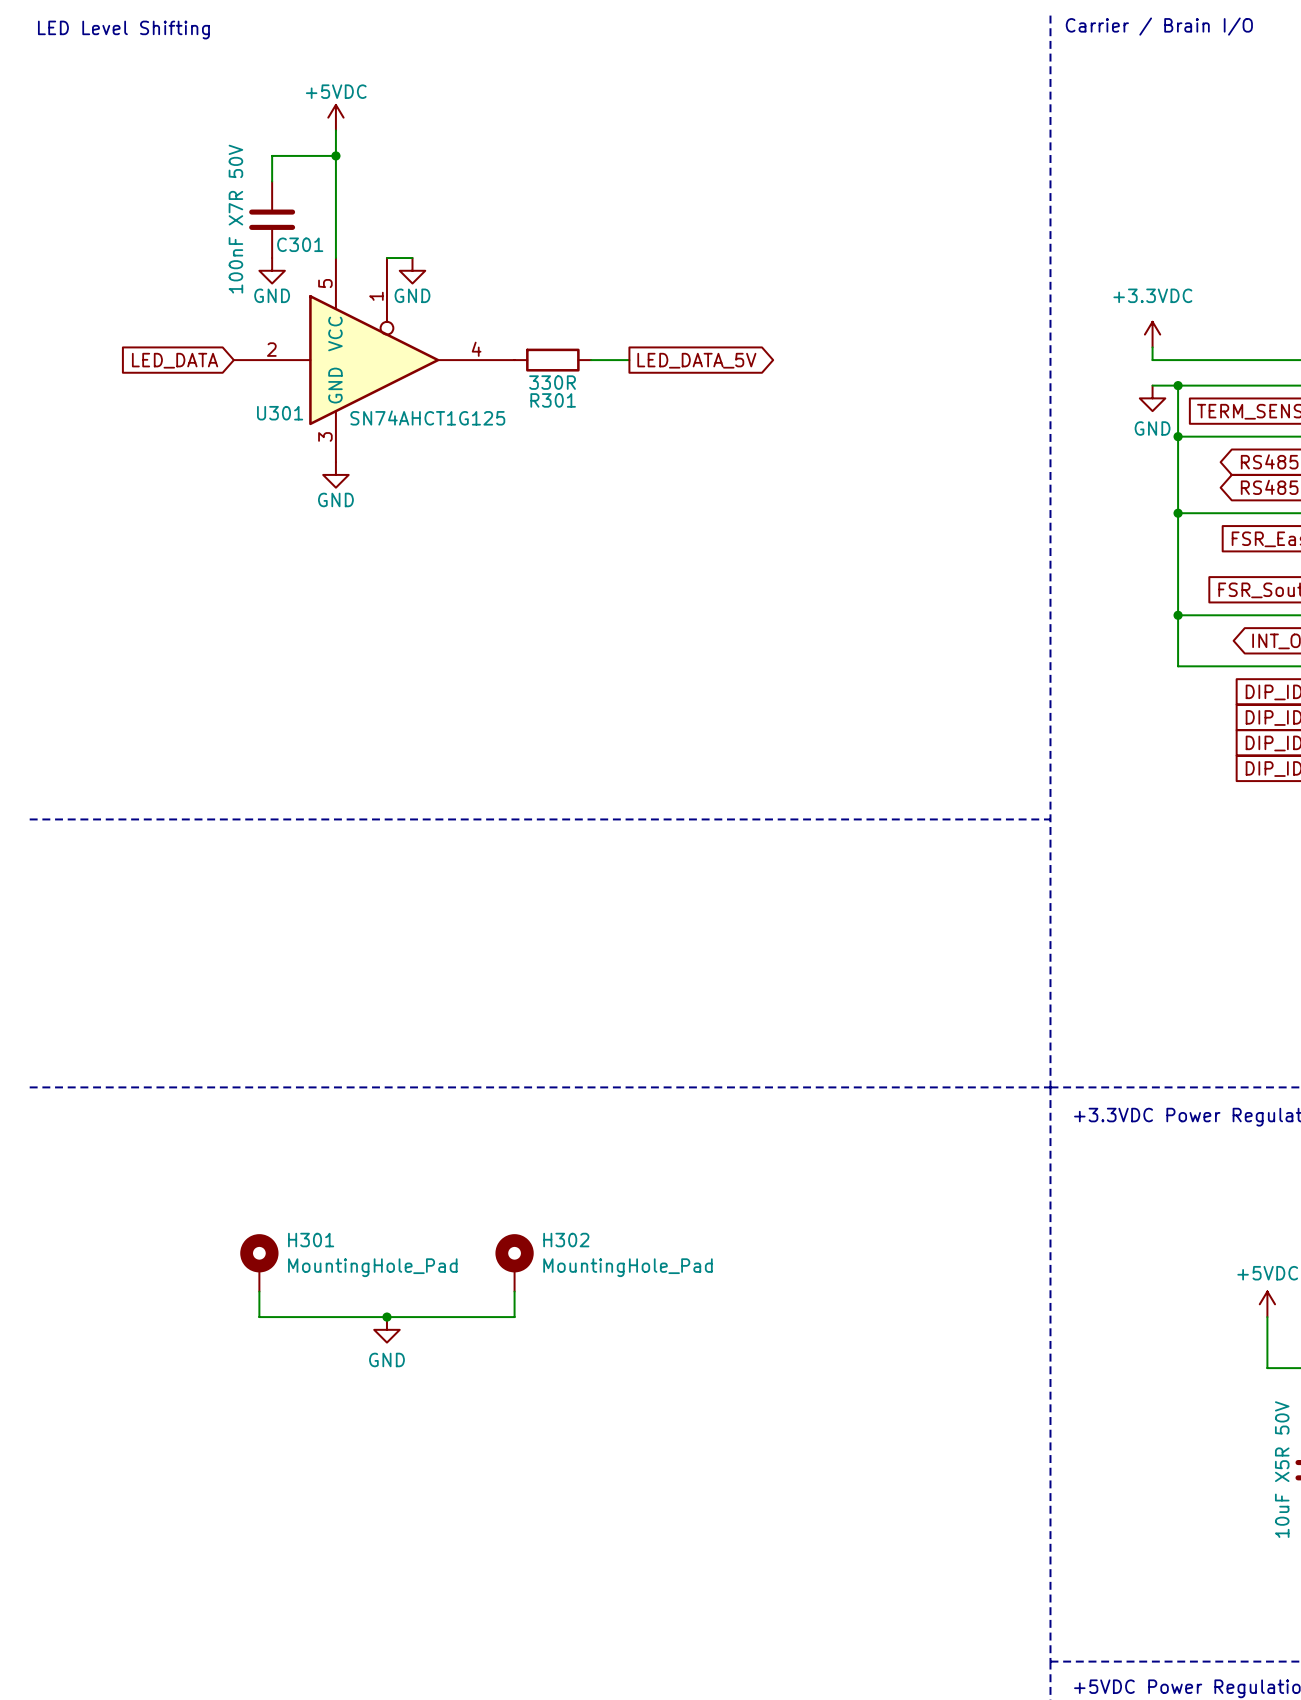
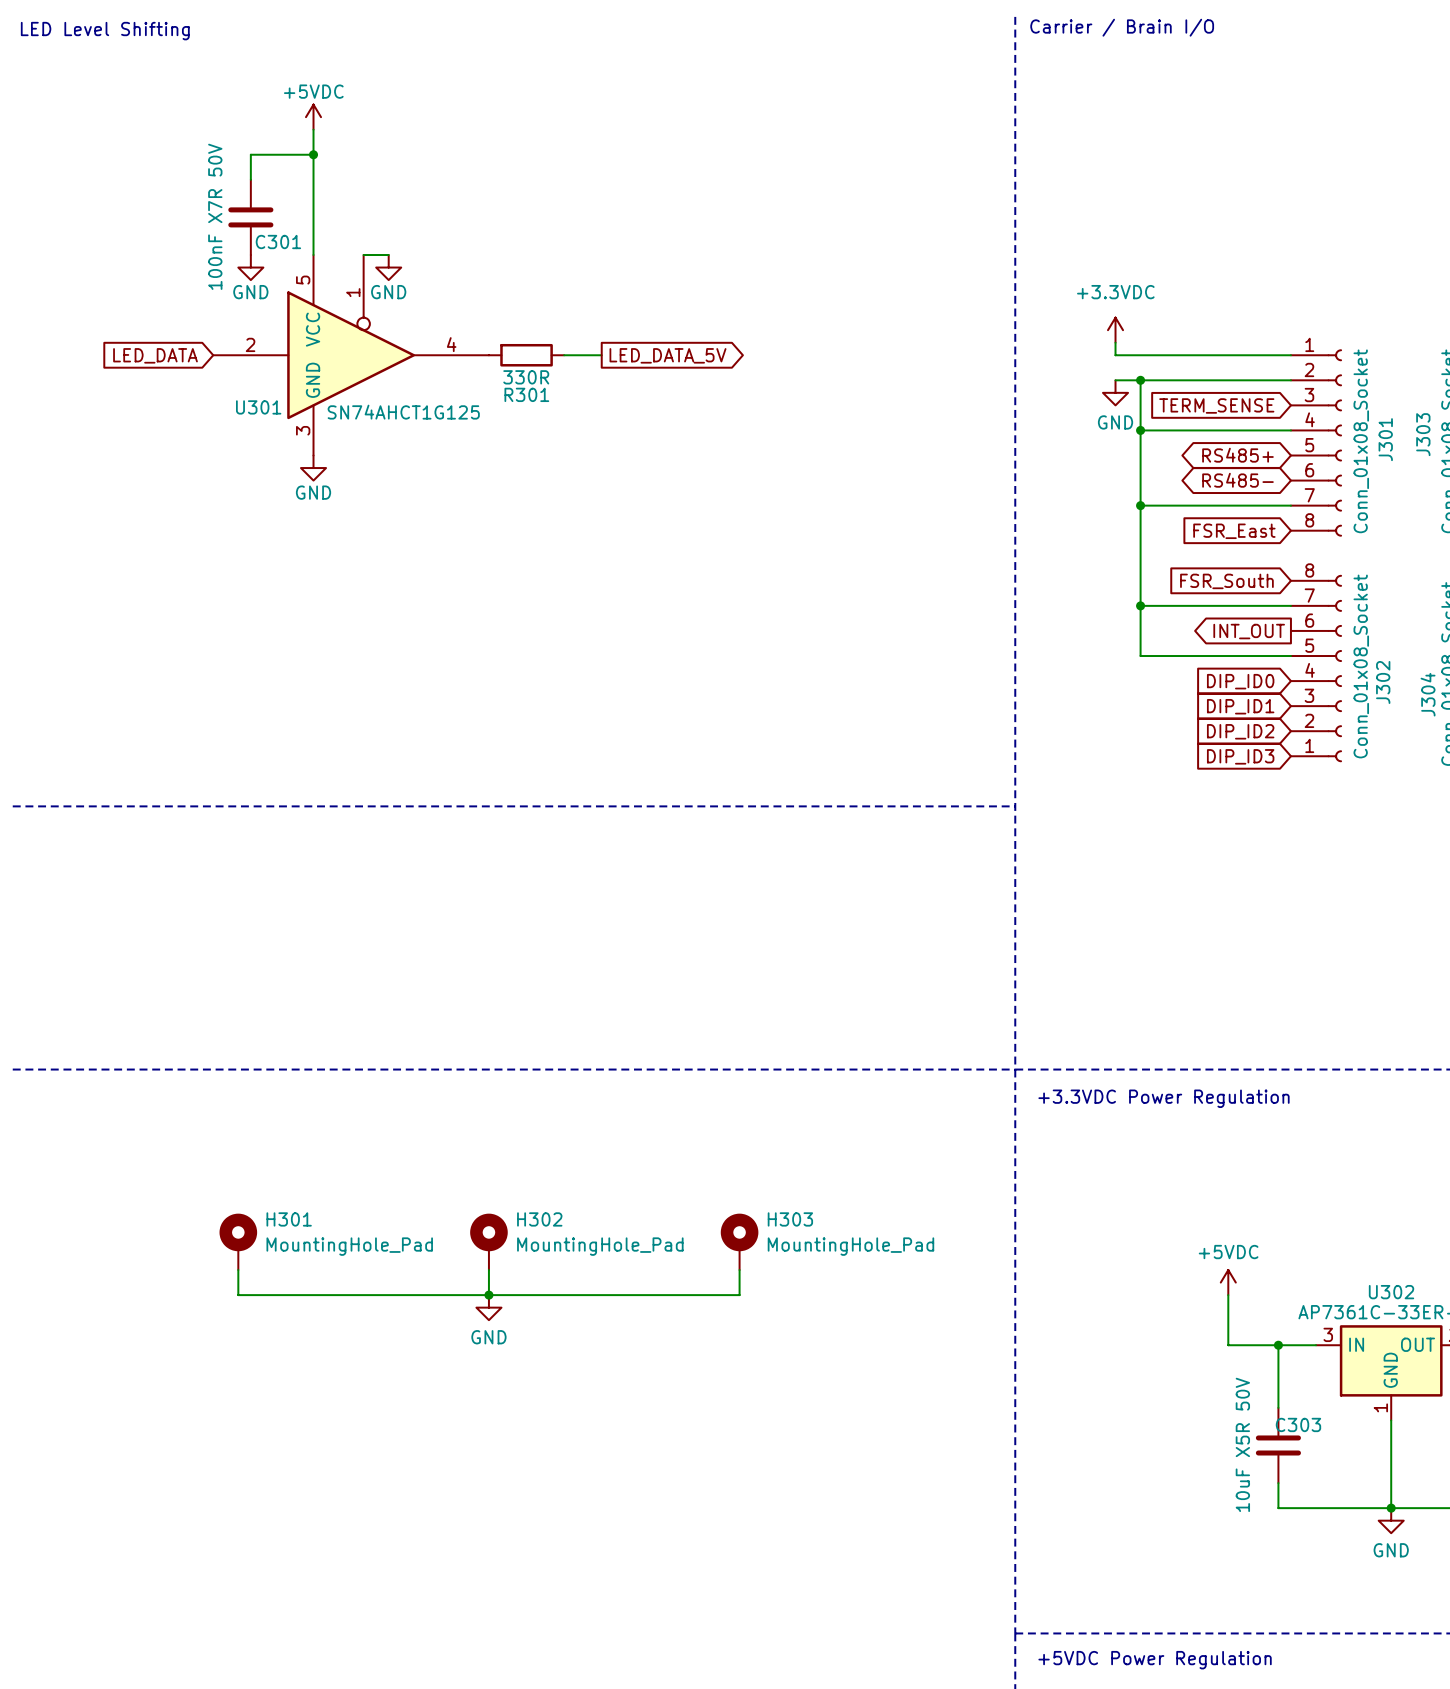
H303: none -> MountingHole_Pad (739, 1241)
wire: none -> (739, 1270) (739, 1295) (488, 1295)
junction: (386, 1317) -> none
junction: none -> (488, 1295)
power symbol position: GND (386, 1329) -> GND (488, 1307)

